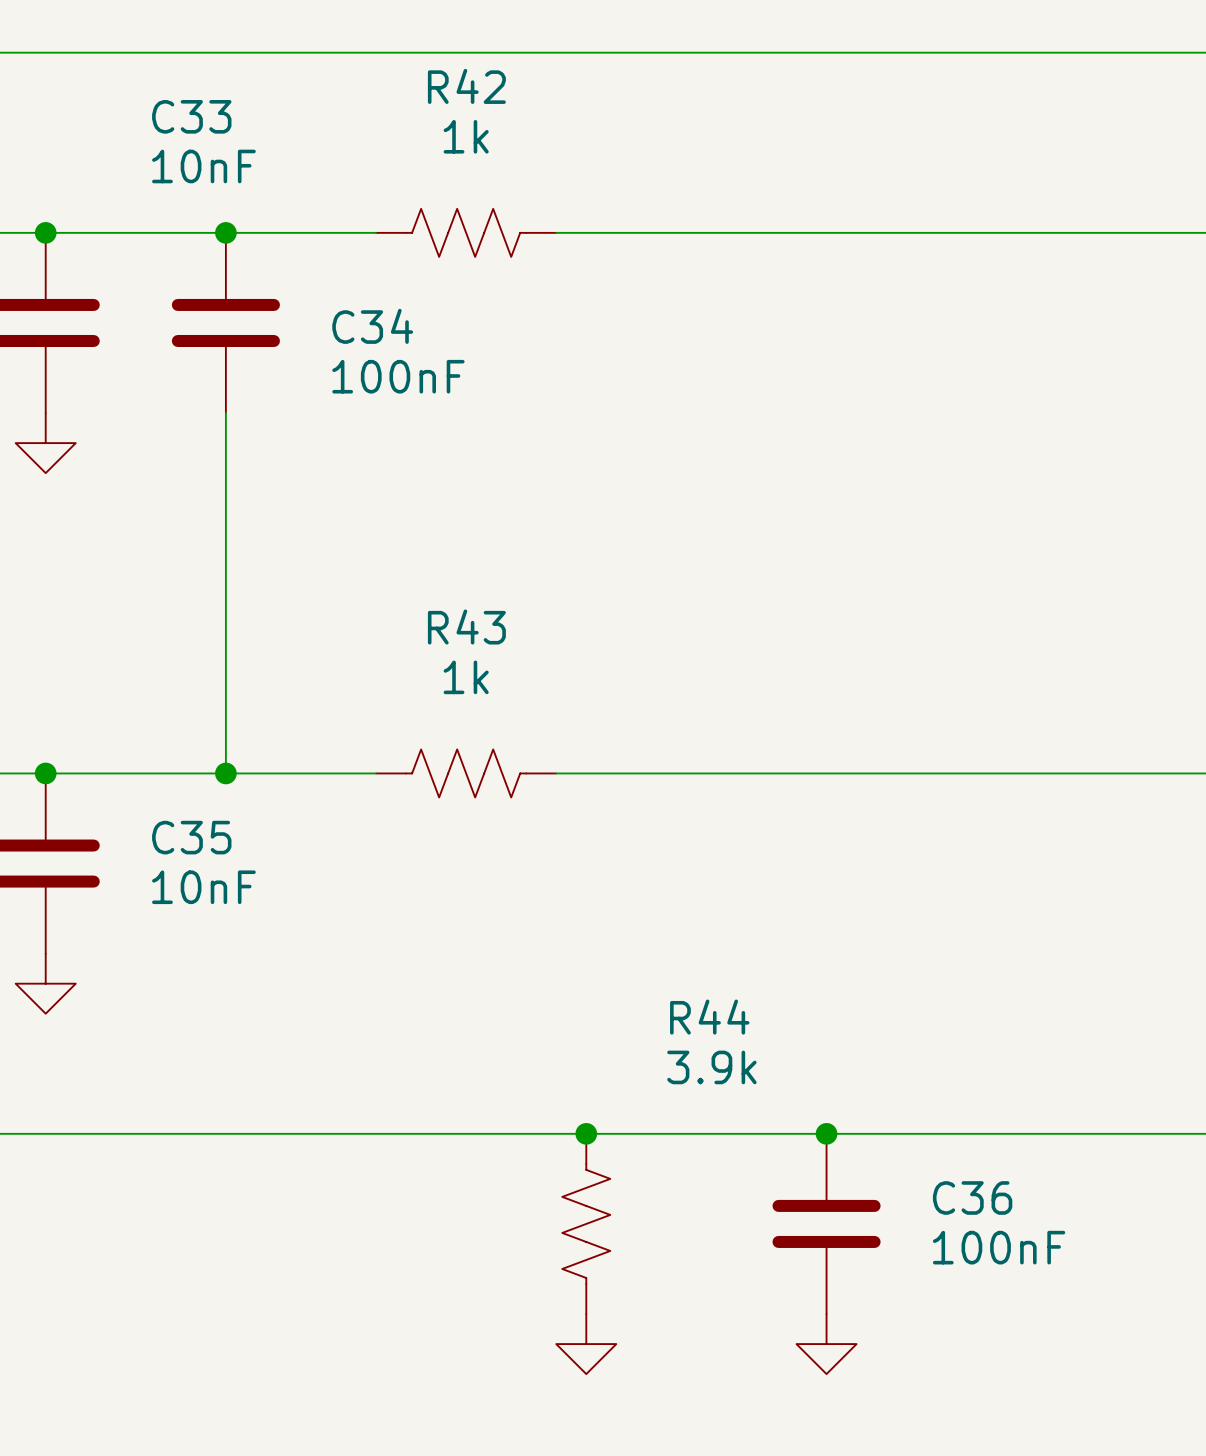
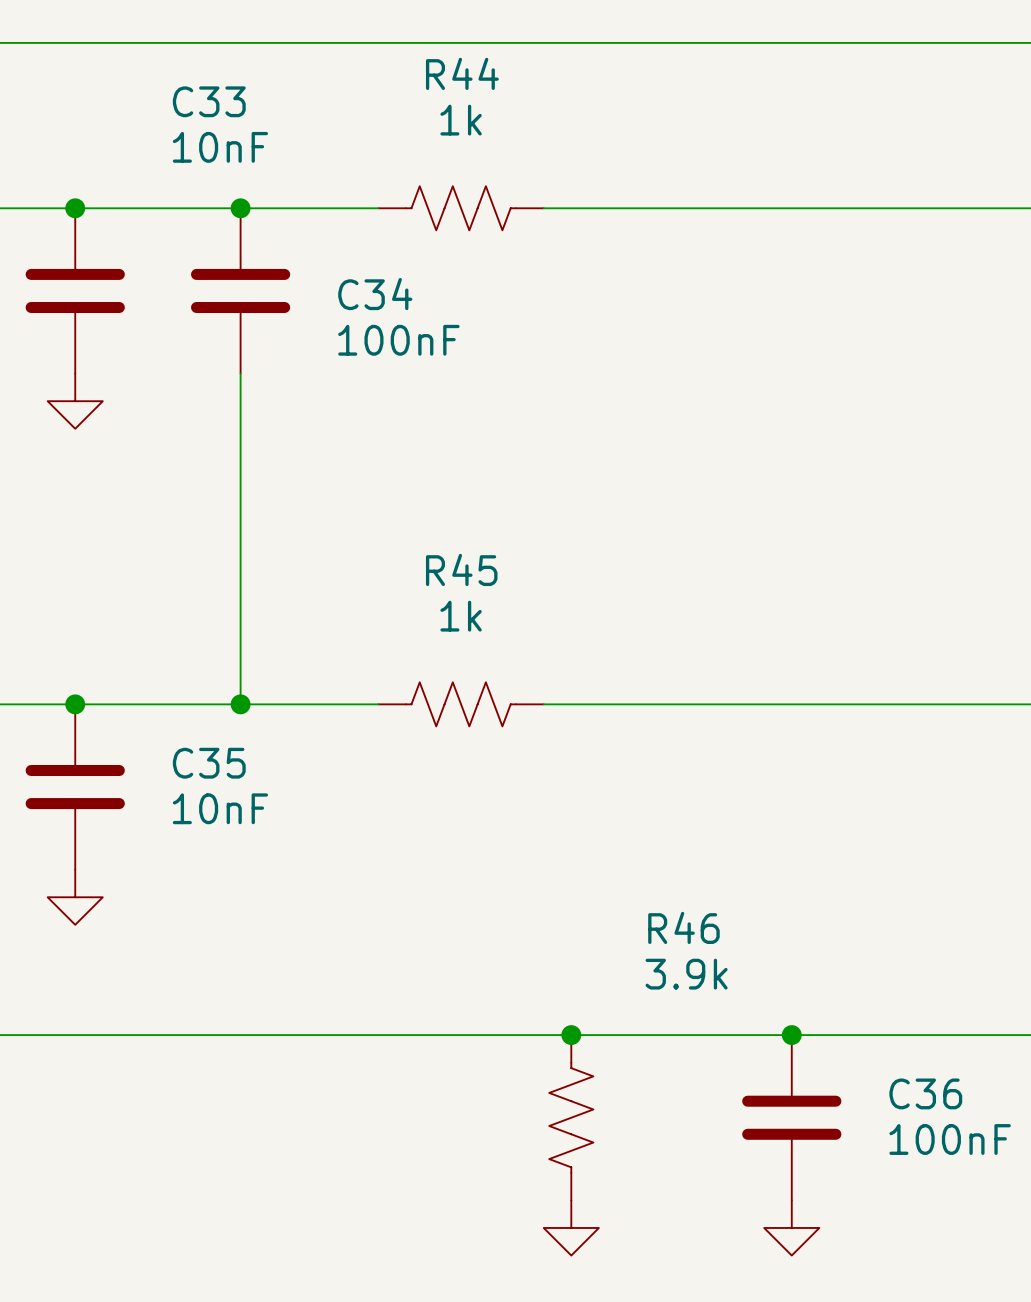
R42 name: R42 (466, 86) -> R44 (462, 73)
R43 name: R43 (466, 626) -> R45 (461, 569)
R44 name: R44 (709, 1017) -> R46 (683, 927)

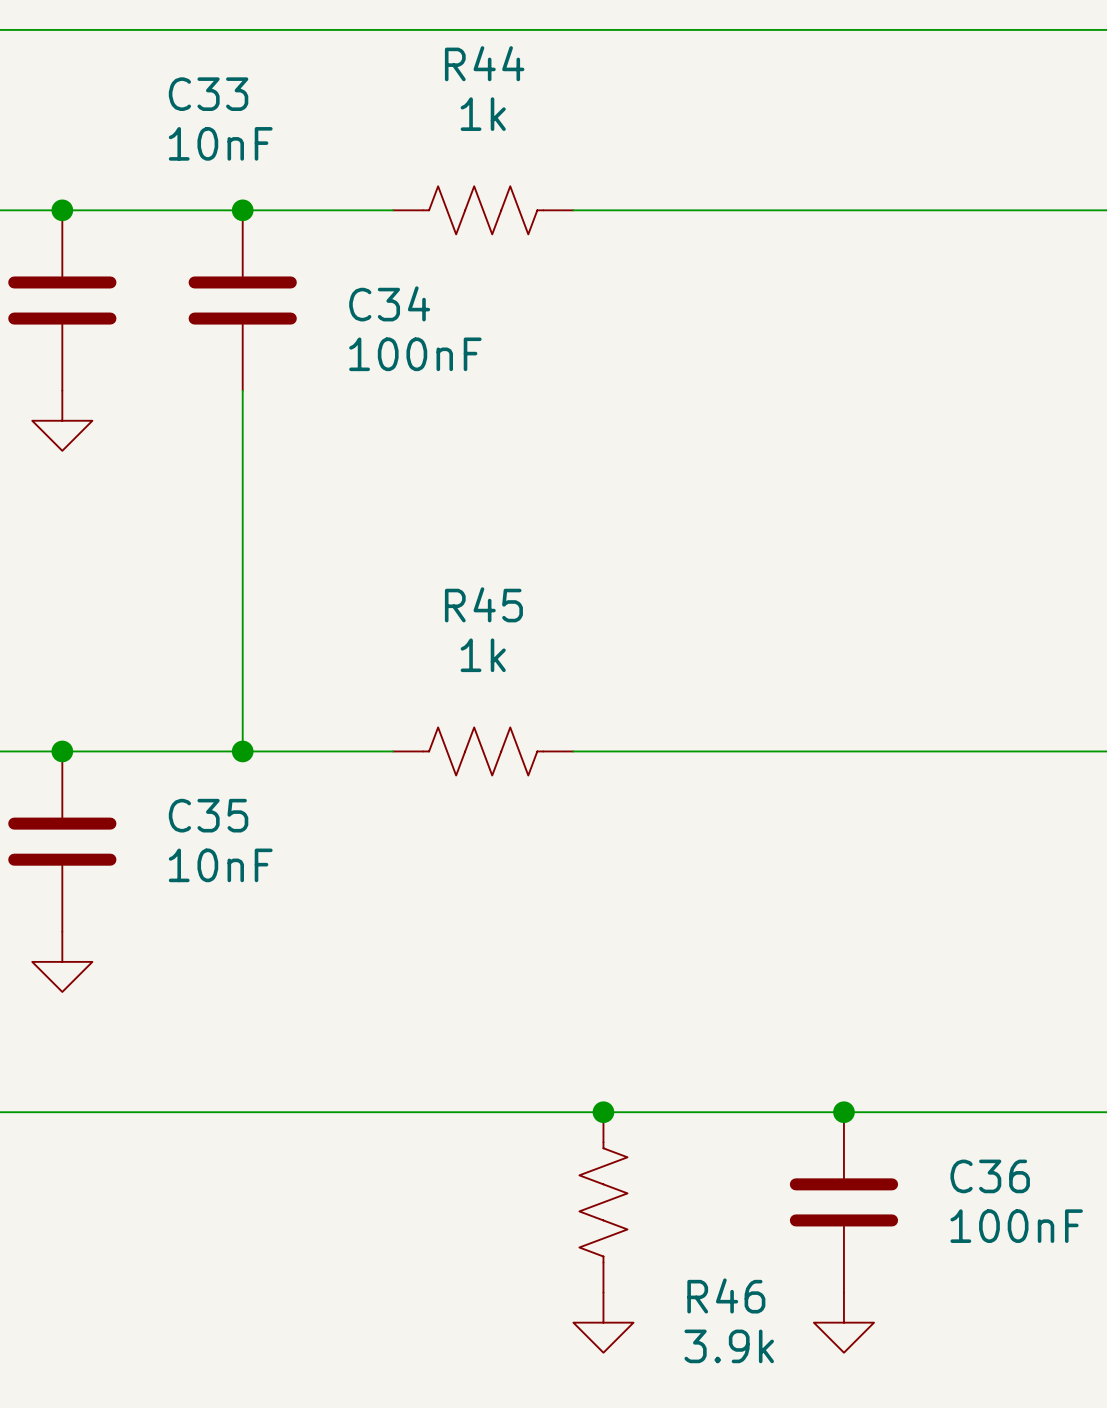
R46 name position: R46 (683, 927) -> R46 (726, 1295)
R46 value position: 3.9k (686, 974) -> 3.9k (729, 1346)

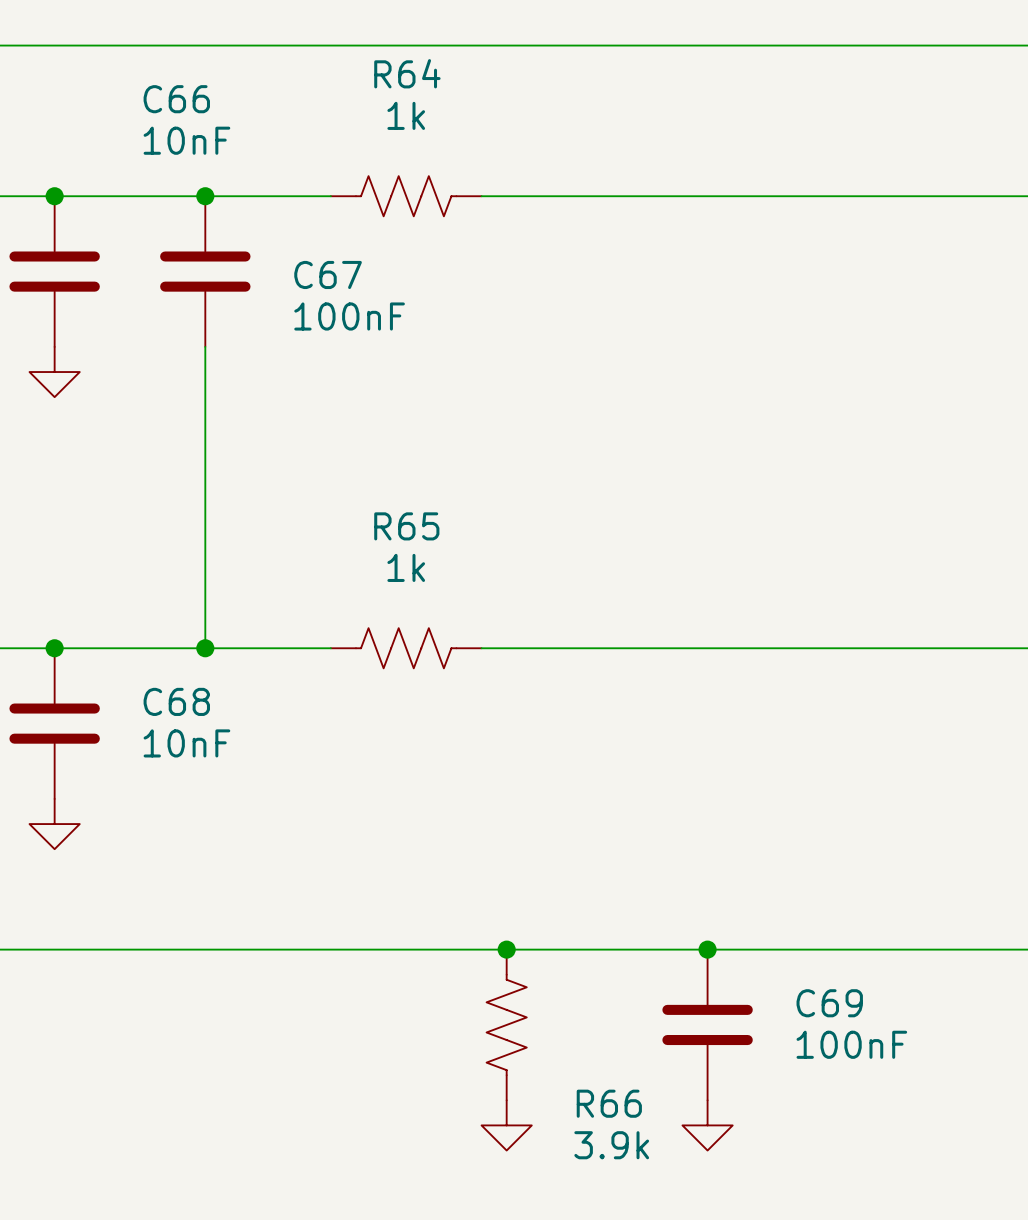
R44 name: R44 (484, 63) -> R64 (407, 73)
C33 name: C33 (208, 94) -> C66 (176, 99)
C34 name: C34 (389, 303) -> C67 (328, 274)
R45 name: R45 (483, 604) -> R65 (406, 526)
C35 name: C35 (208, 815) -> C68 (176, 701)
C36 name: C36 (990, 1176) -> C69 (829, 1003)
R46 name: R46 (726, 1295) -> R66 (609, 1103)

